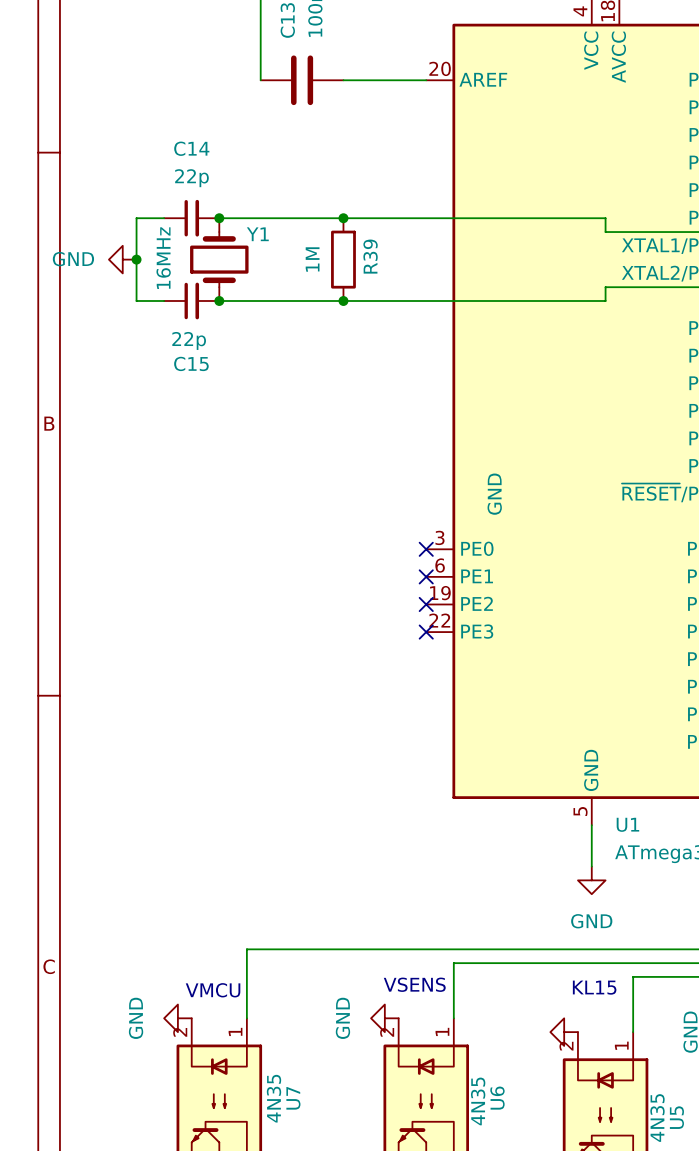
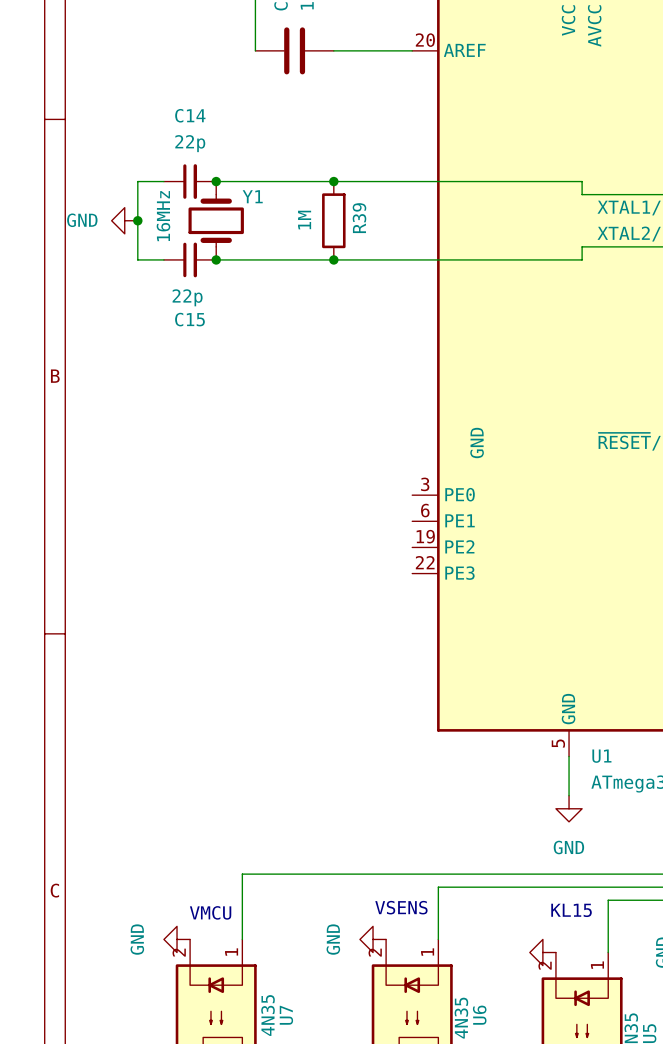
no-connect mark: (426, 549) -> none
no-connect mark: (426, 576) -> none
no-connect mark: (426, 604) -> none
no-connect mark: (426, 632) -> none

